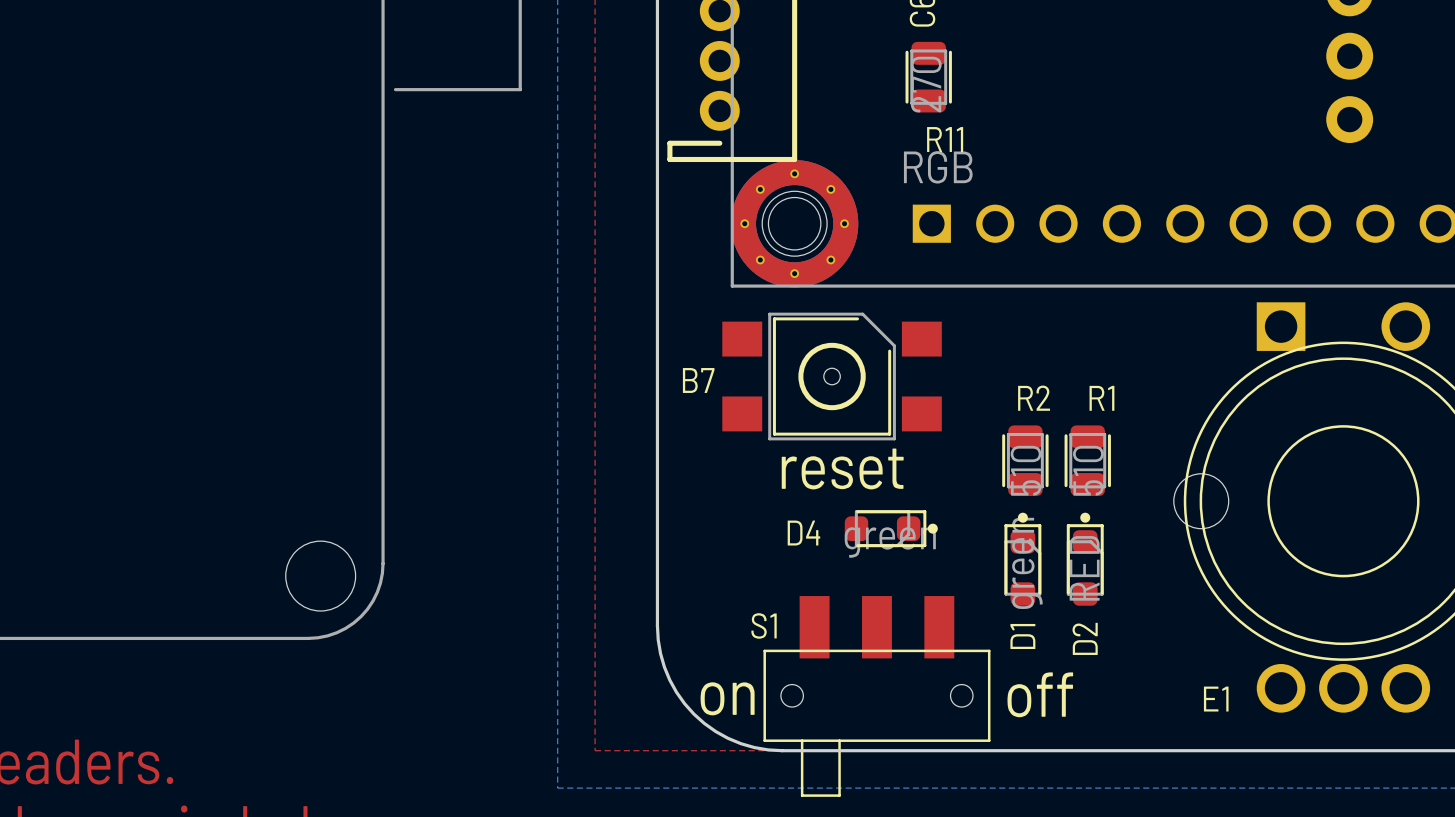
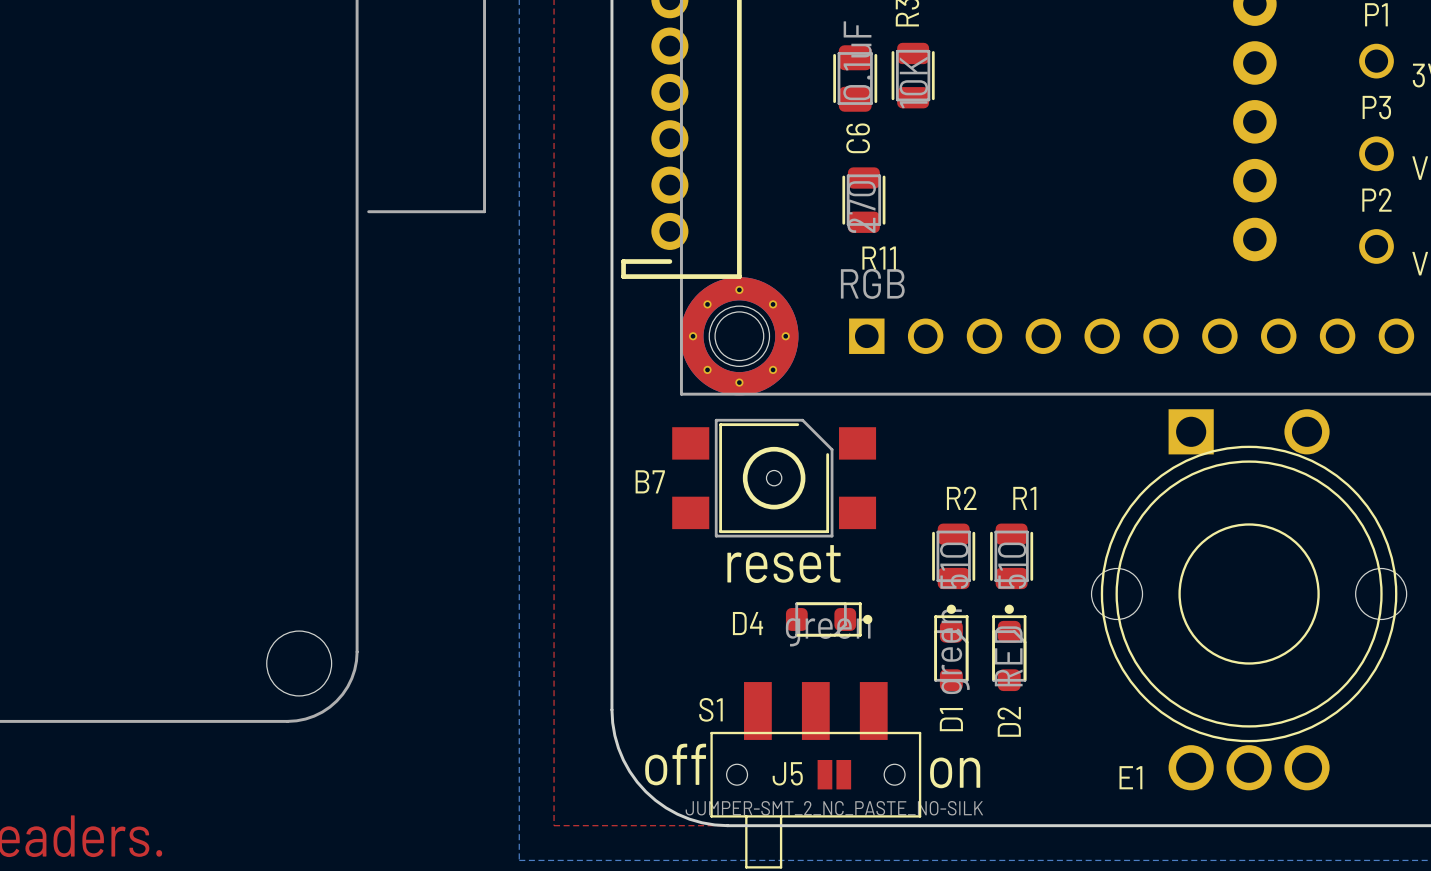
text: off (1040, 694) -> on (955, 772)
J5: none -> JUMPER-SMT_2_NC_PASTE_NO-SILK (834, 774)
text: on (727, 698) -> off (675, 764)

